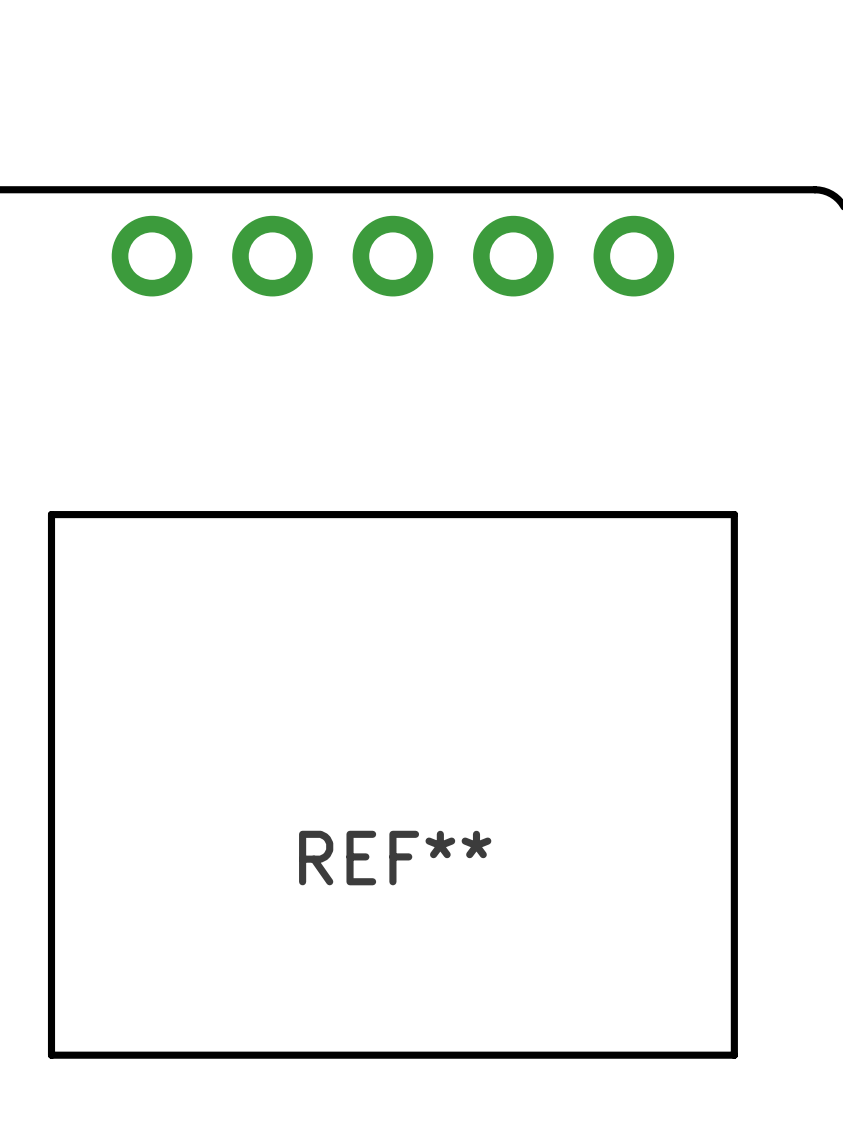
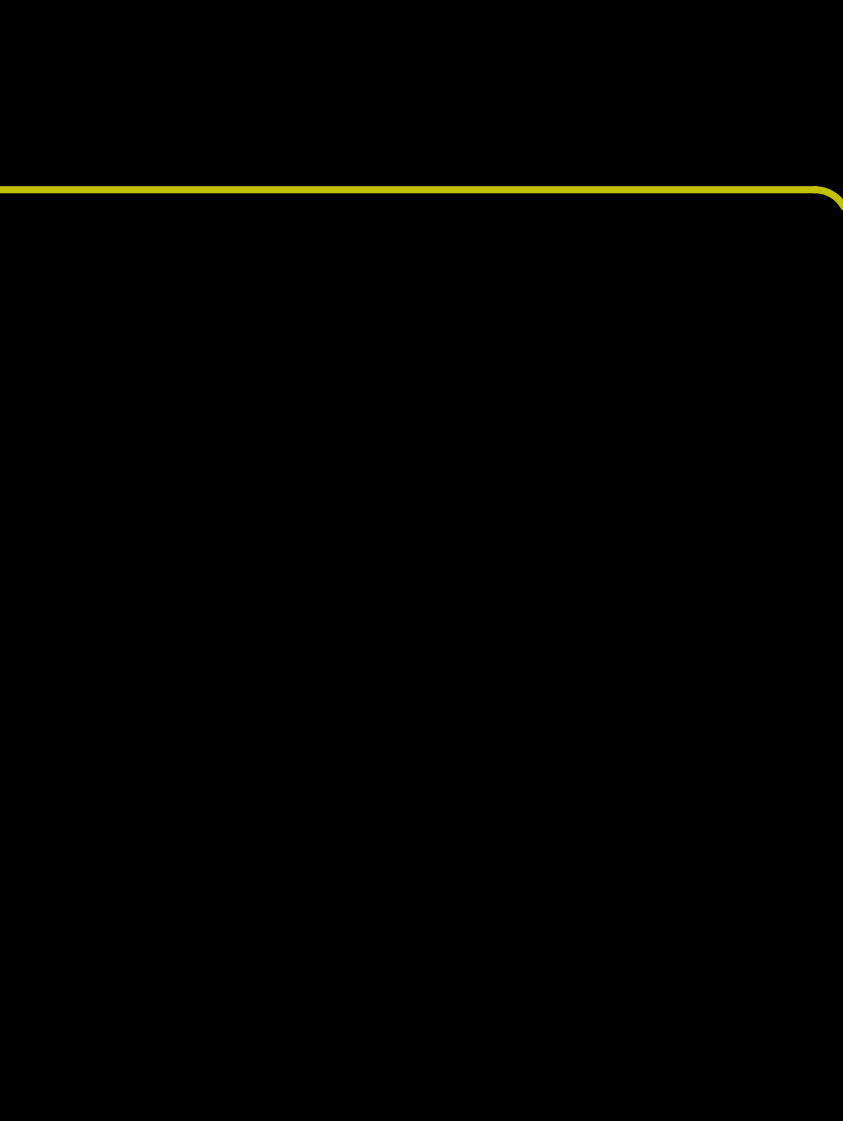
REF**: (392, 256) -> none
board edge: (51, 514) (734, 514) (734, 1055) (51, 1055) (51, 514) -> none

